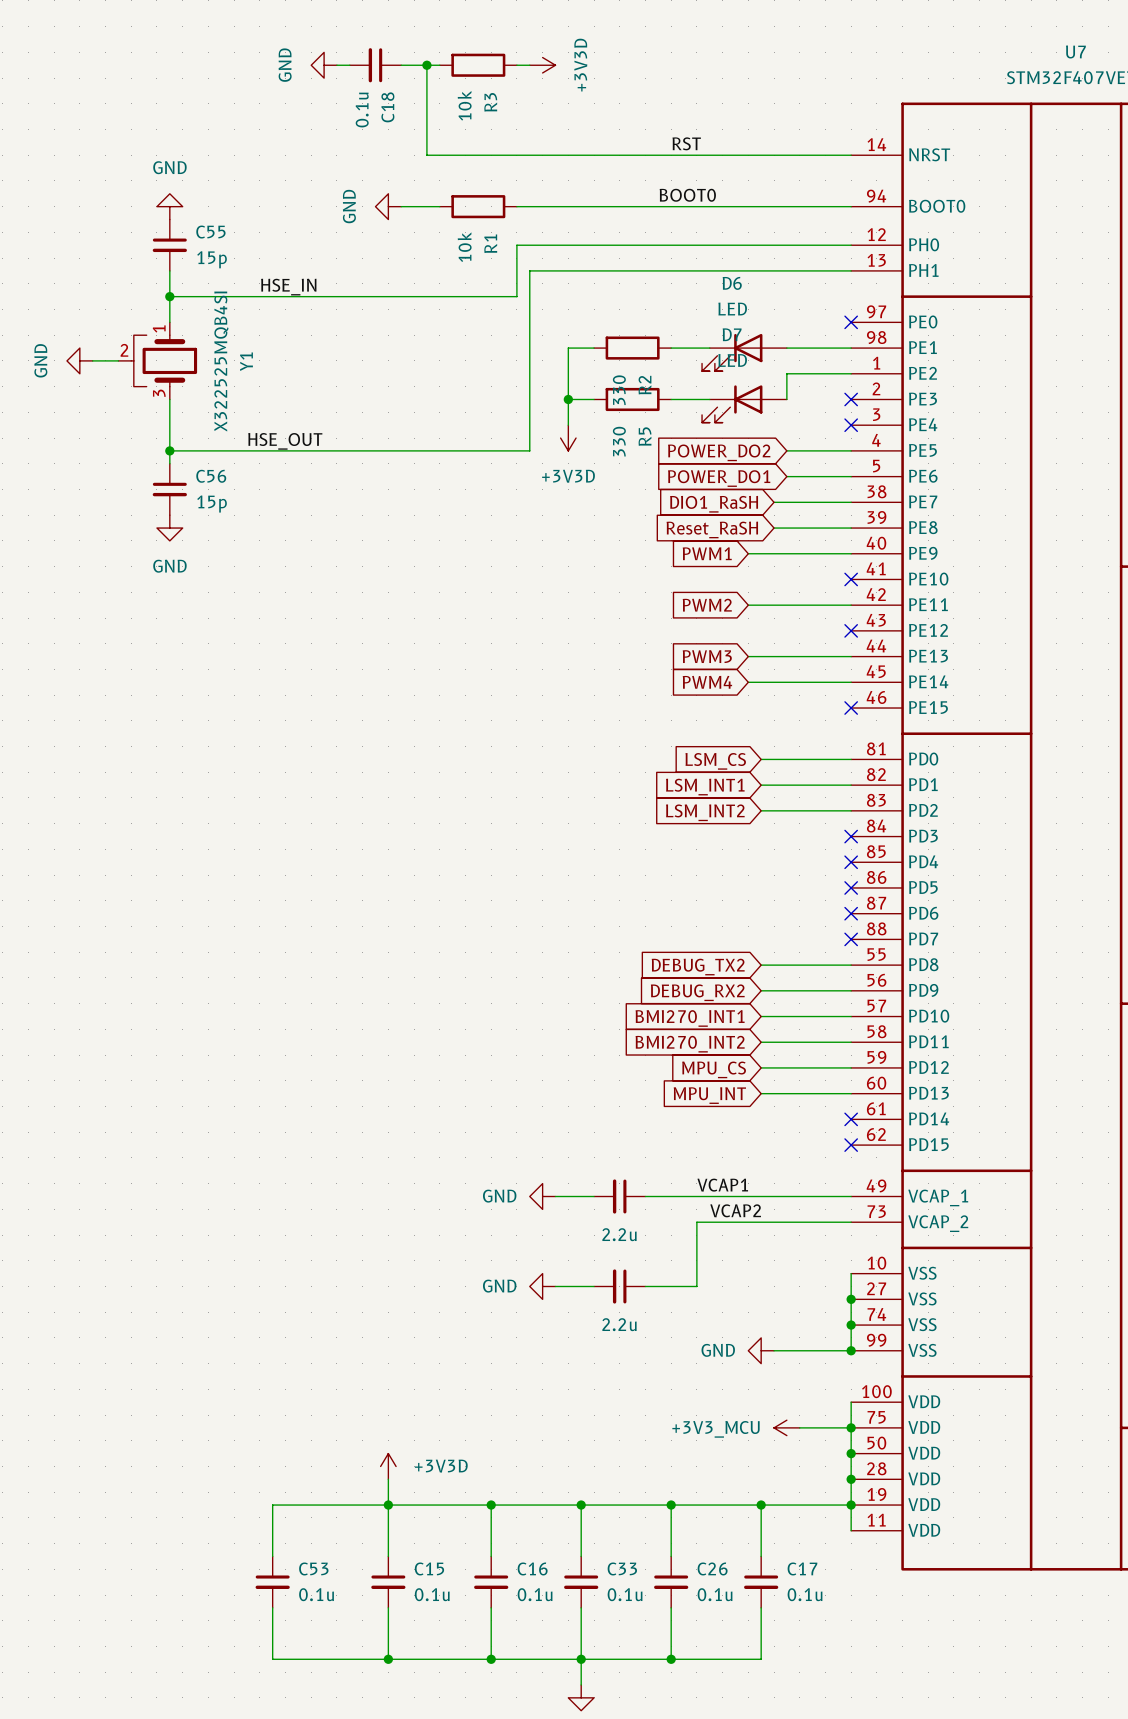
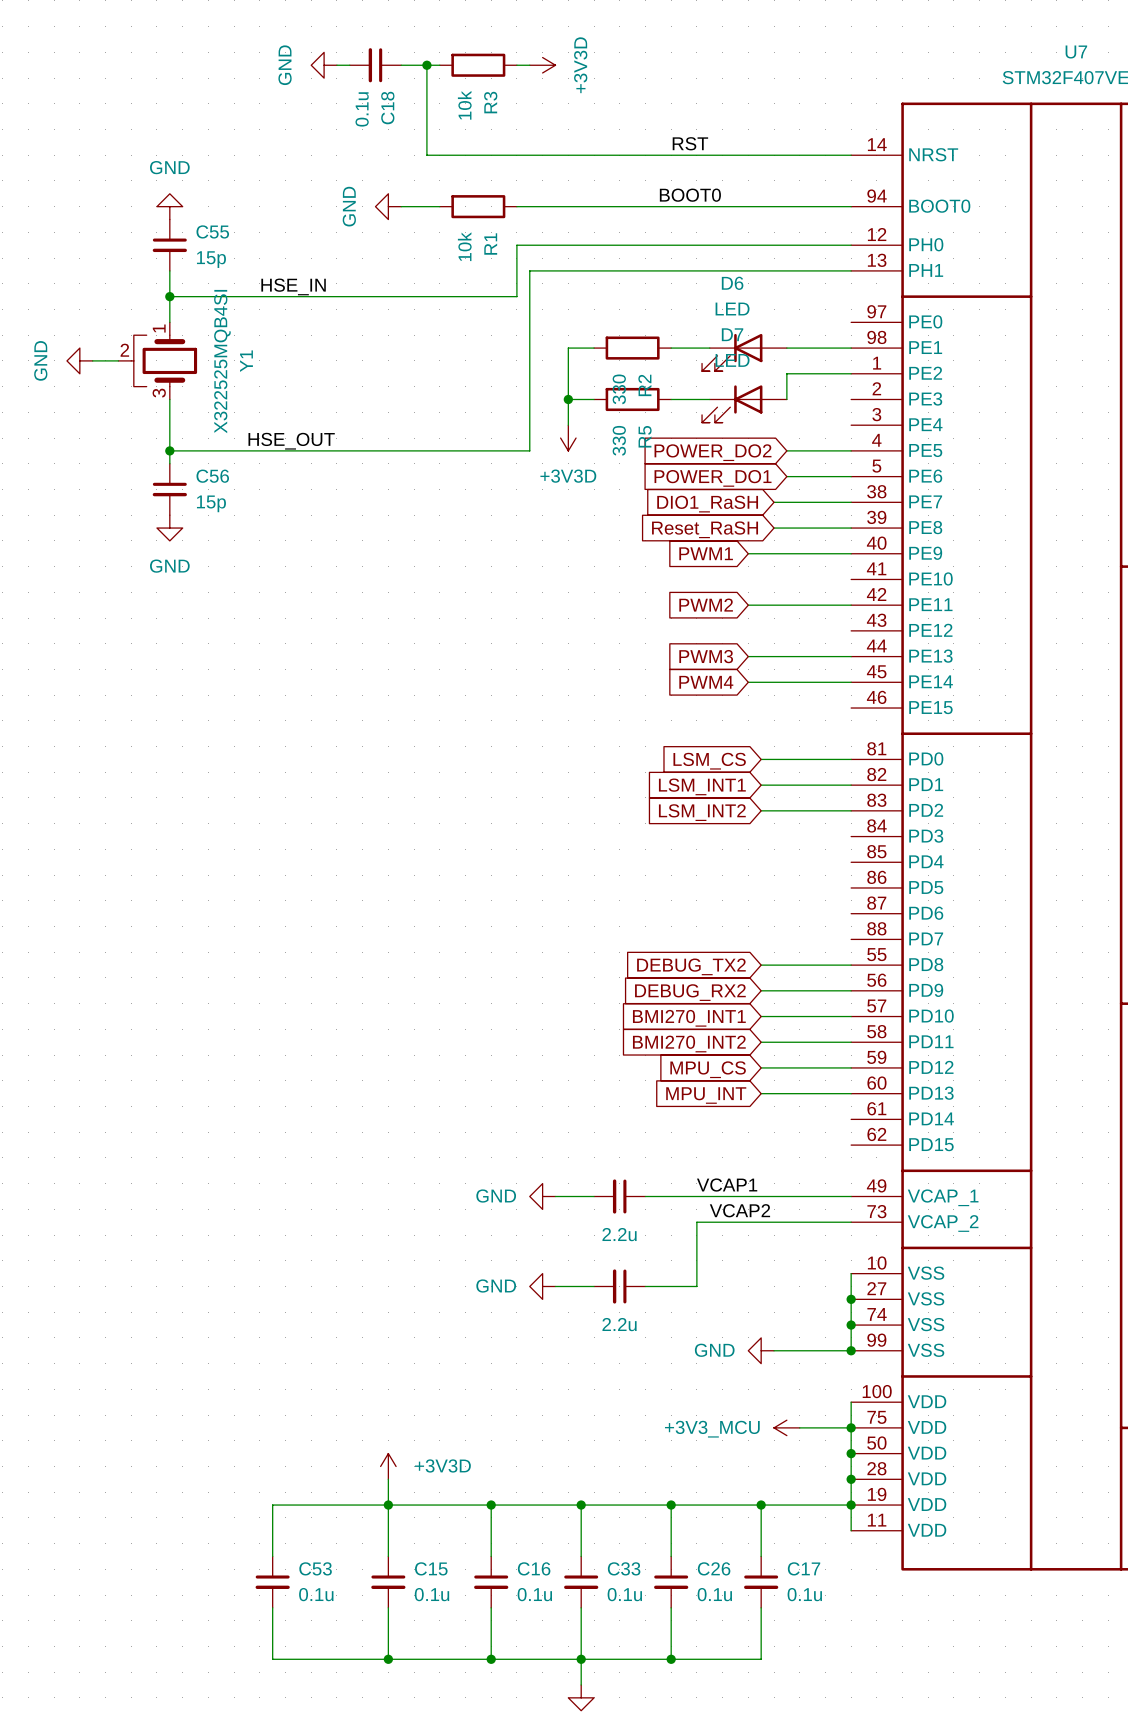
no-connect mark: (851, 322) -> none
no-connect mark: (851, 399) -> none
no-connect mark: (851, 425) -> none
no-connect mark: (851, 579) -> none
no-connect mark: (851, 630) -> none
no-connect mark: (851, 708) -> none
no-connect mark: (851, 836) -> none
no-connect mark: (851, 862) -> none
no-connect mark: (851, 887) -> none
no-connect mark: (851, 913) -> none
no-connect mark: (851, 939) -> none
no-connect mark: (851, 1119) -> none
no-connect mark: (851, 1145) -> none

